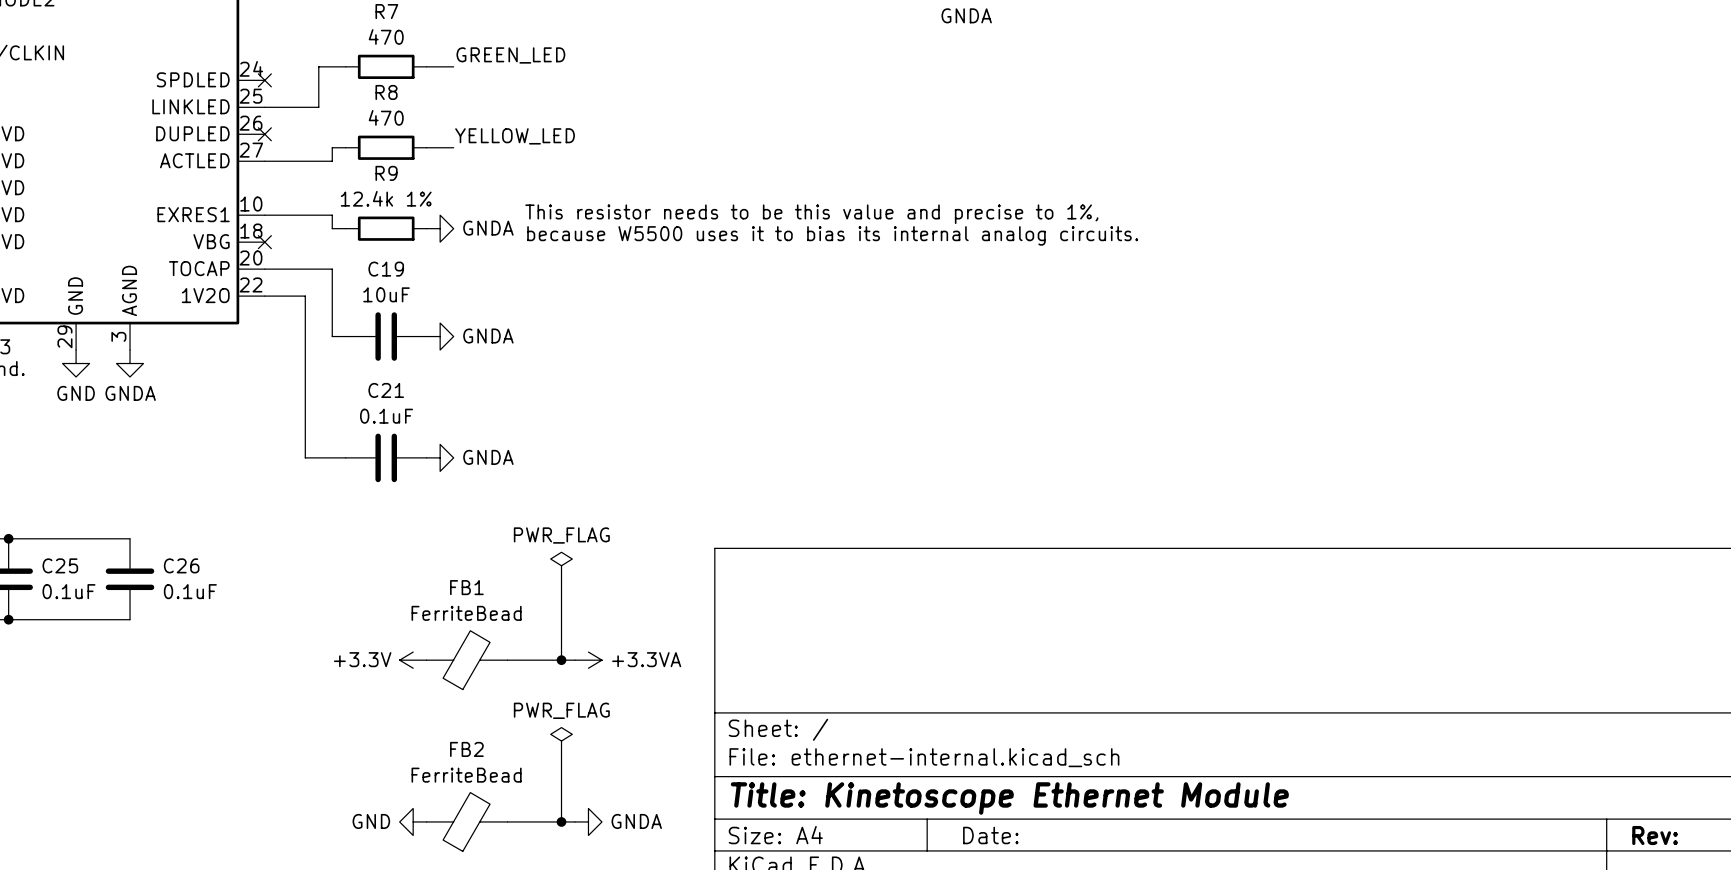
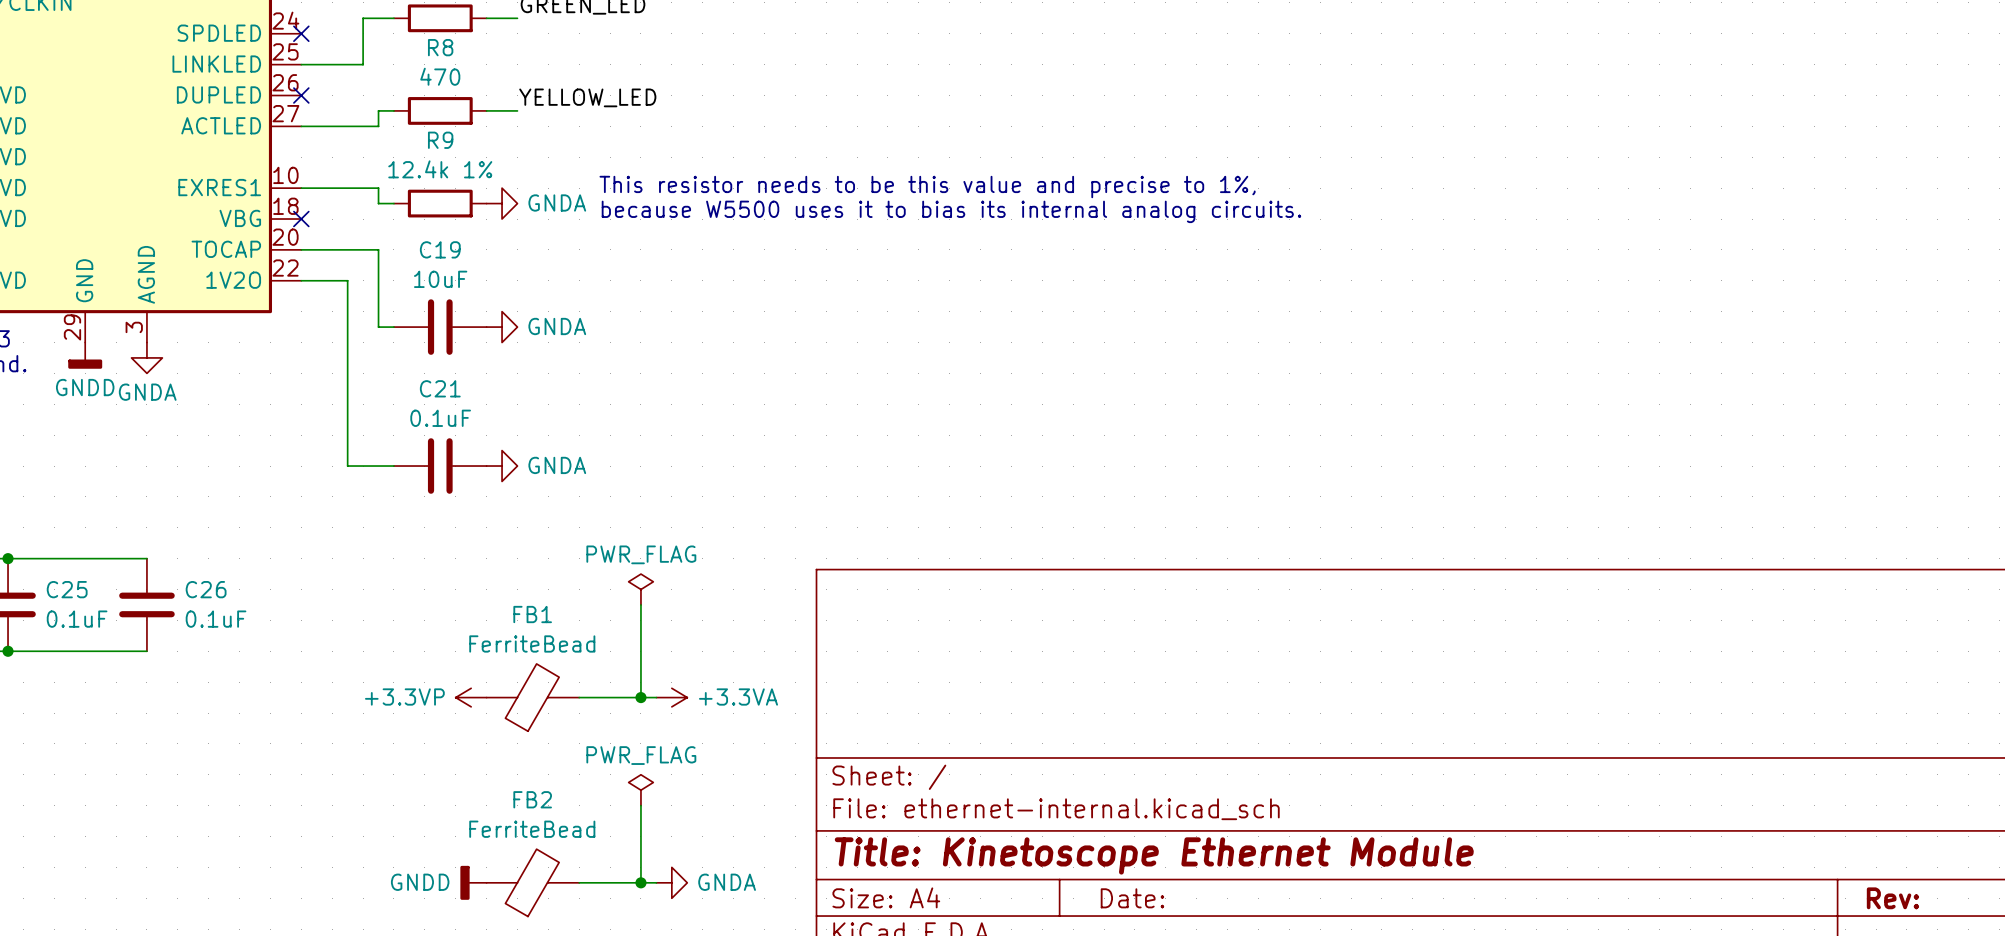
power symbol: GND (76, 363) -> GNDD (85, 355)
power symbol: +3.3V (413, 660) -> +3.3VP (471, 697)
power symbol: GND (413, 821) -> GNDD (473, 882)

